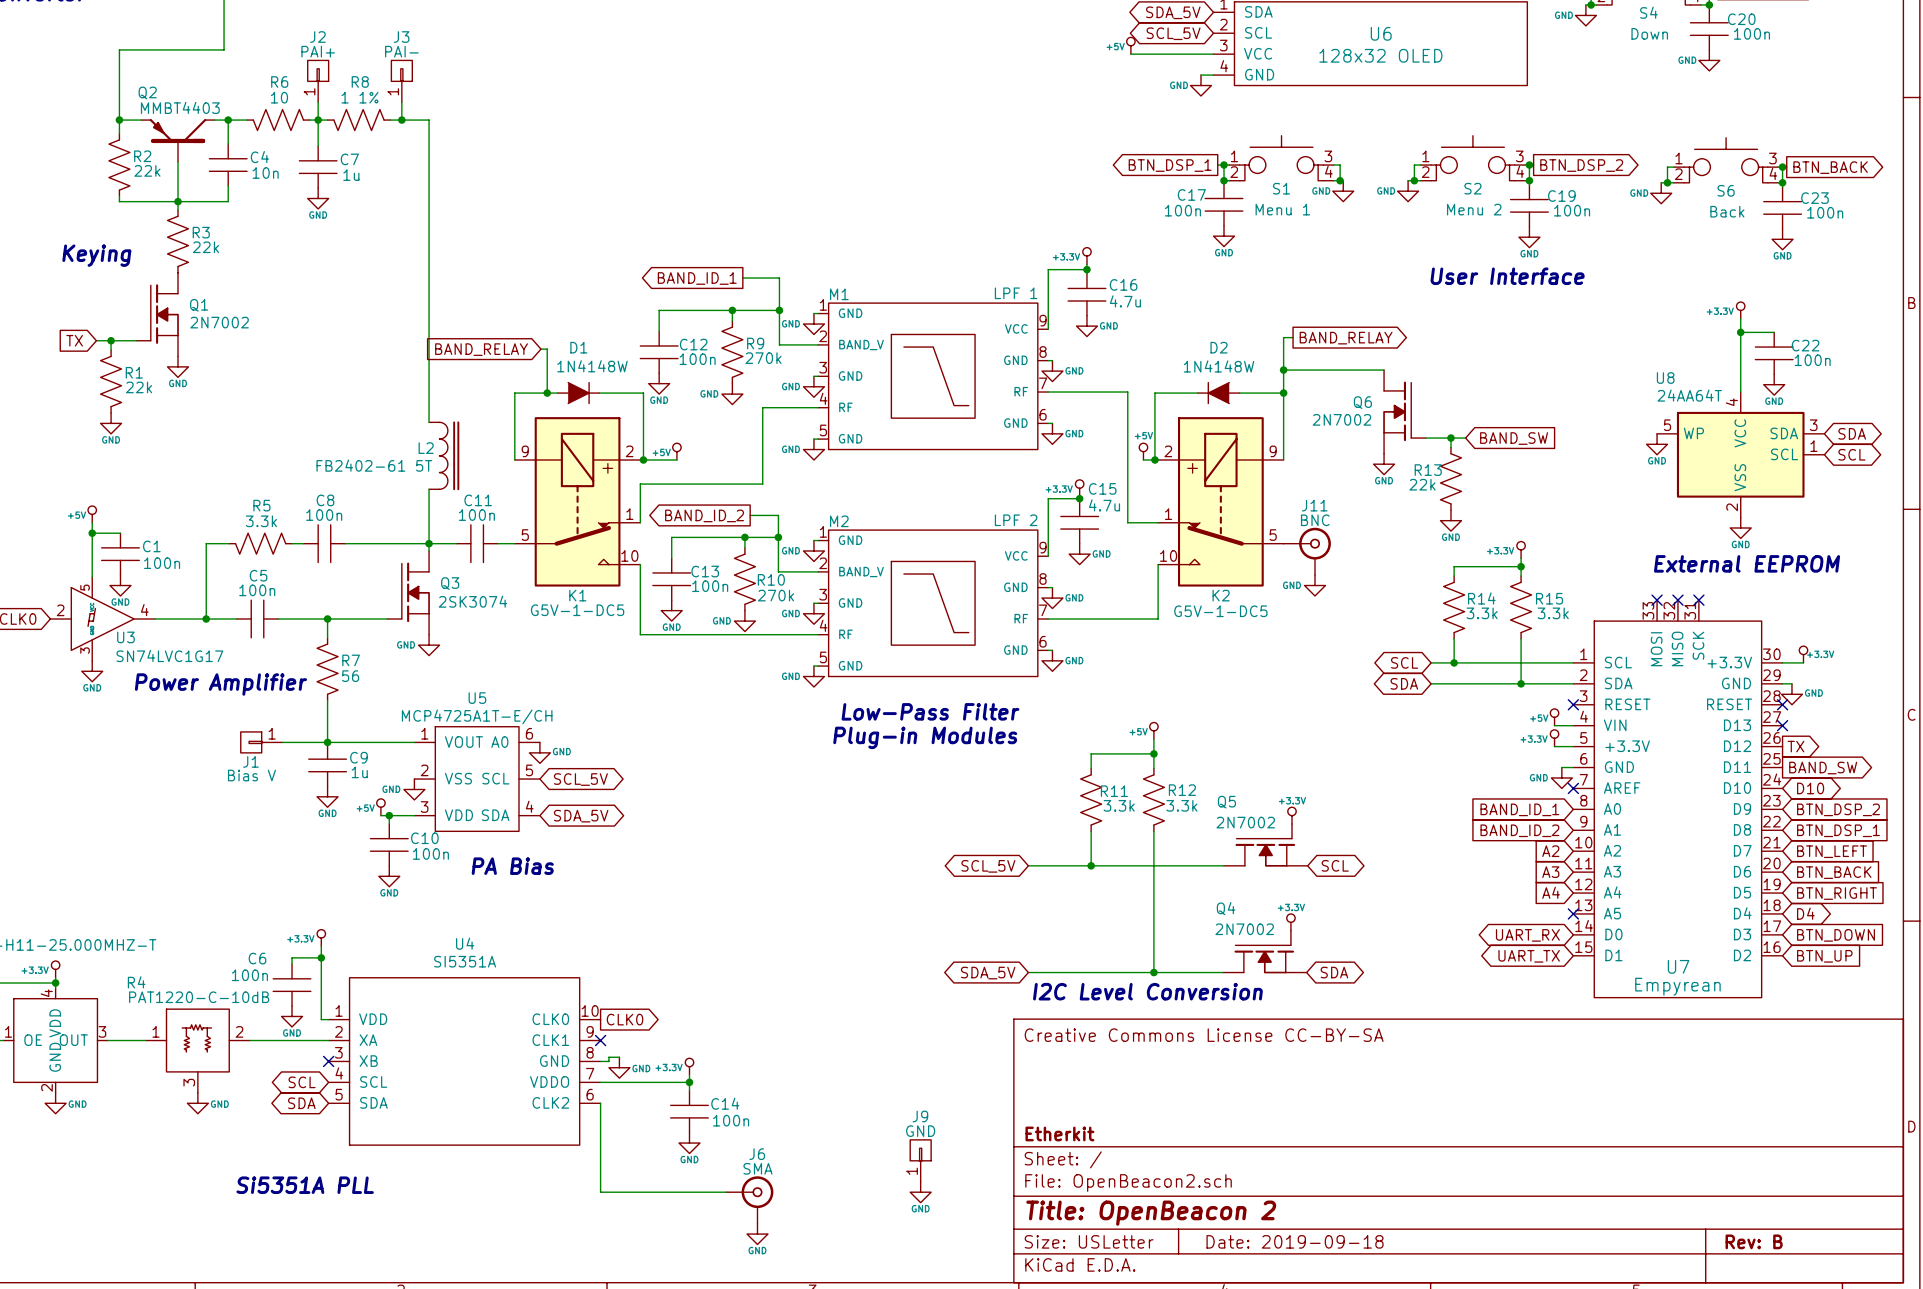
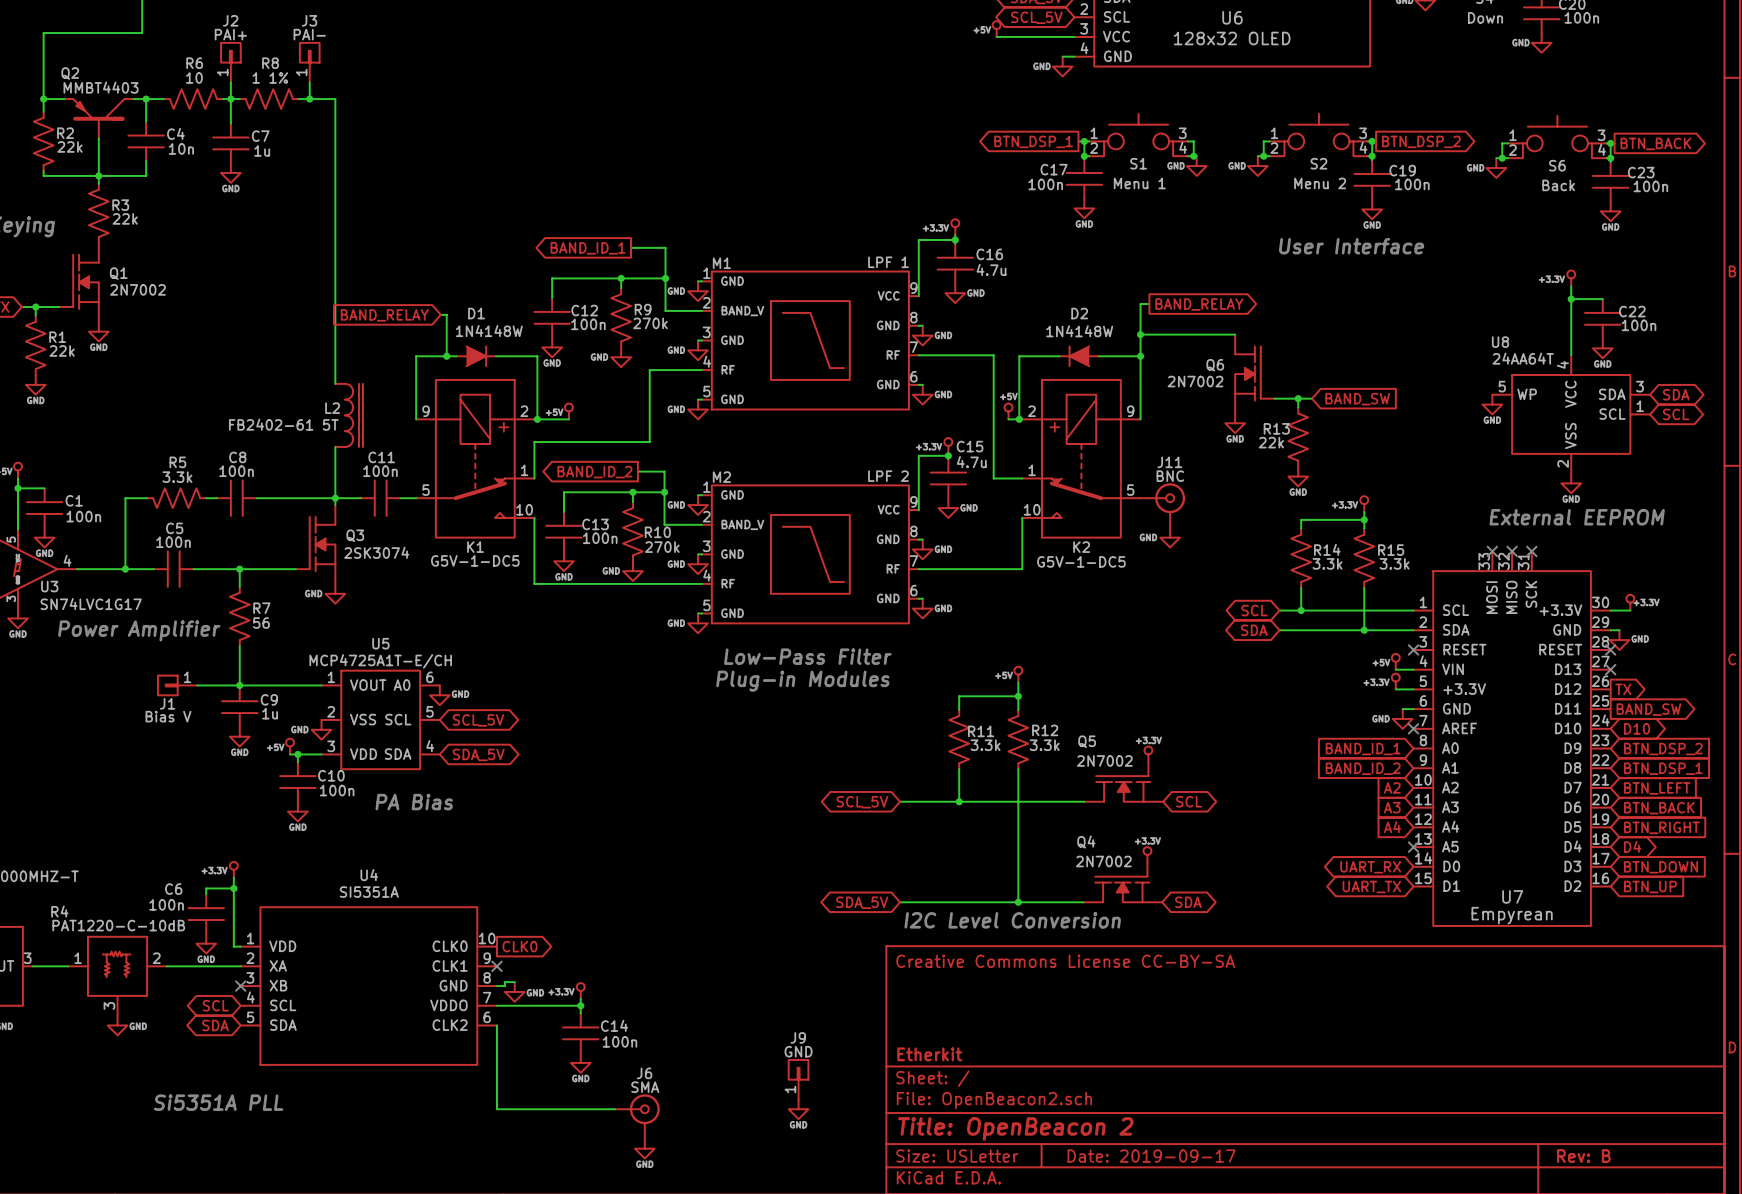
title block: Date: 2019-09-18 (1295, 1241) -> Date: 2019-09-17 (1151, 1156)

